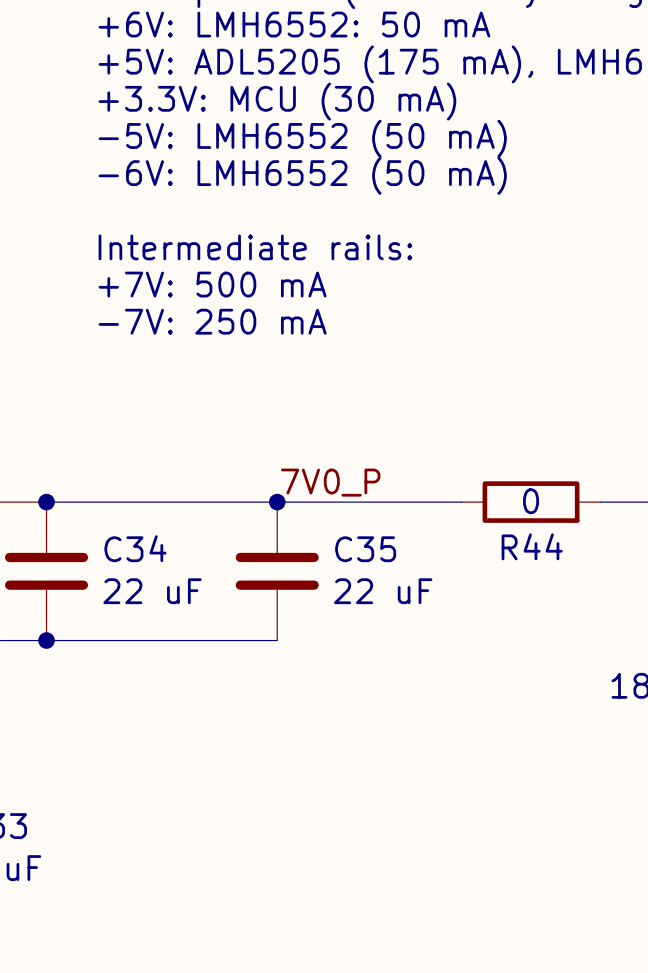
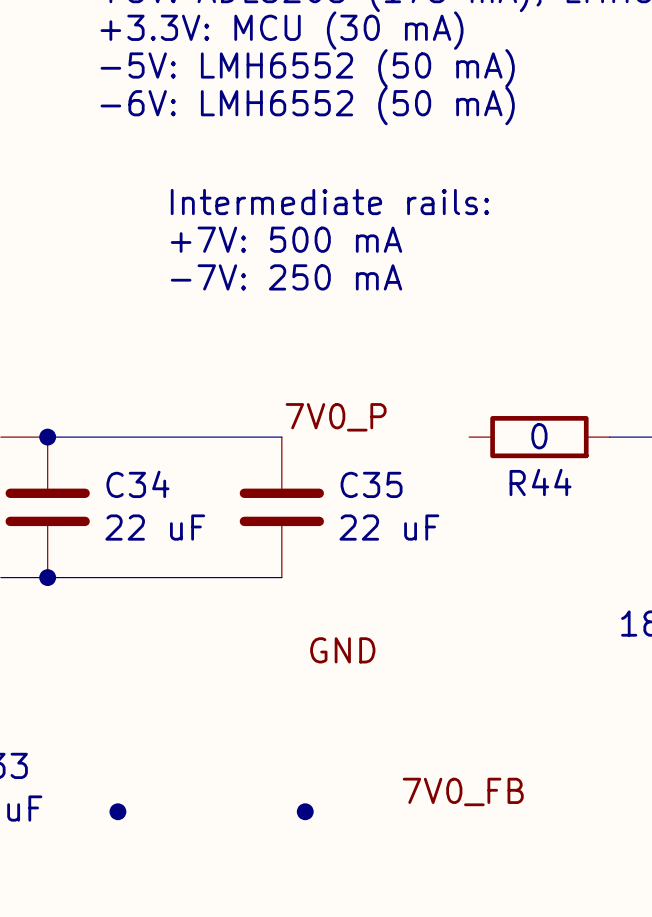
text position: Intermediate rails: (255, 247) -> Intermediate rails: (329, 202)
text position: +7V: 500 mA (212, 284) -> +7V: 500 mA (286, 239)
text position: -7V: 250 mA (212, 321) -> -7V: 250 mA (286, 277)
wire: (277, 502) (461, 502) -> none
junction: (277, 502) -> none
label: none -> GND (342, 650)
label: none -> 7V0_FB (463, 791)
junction: none -> (117, 811)
junction: none -> (305, 811)

